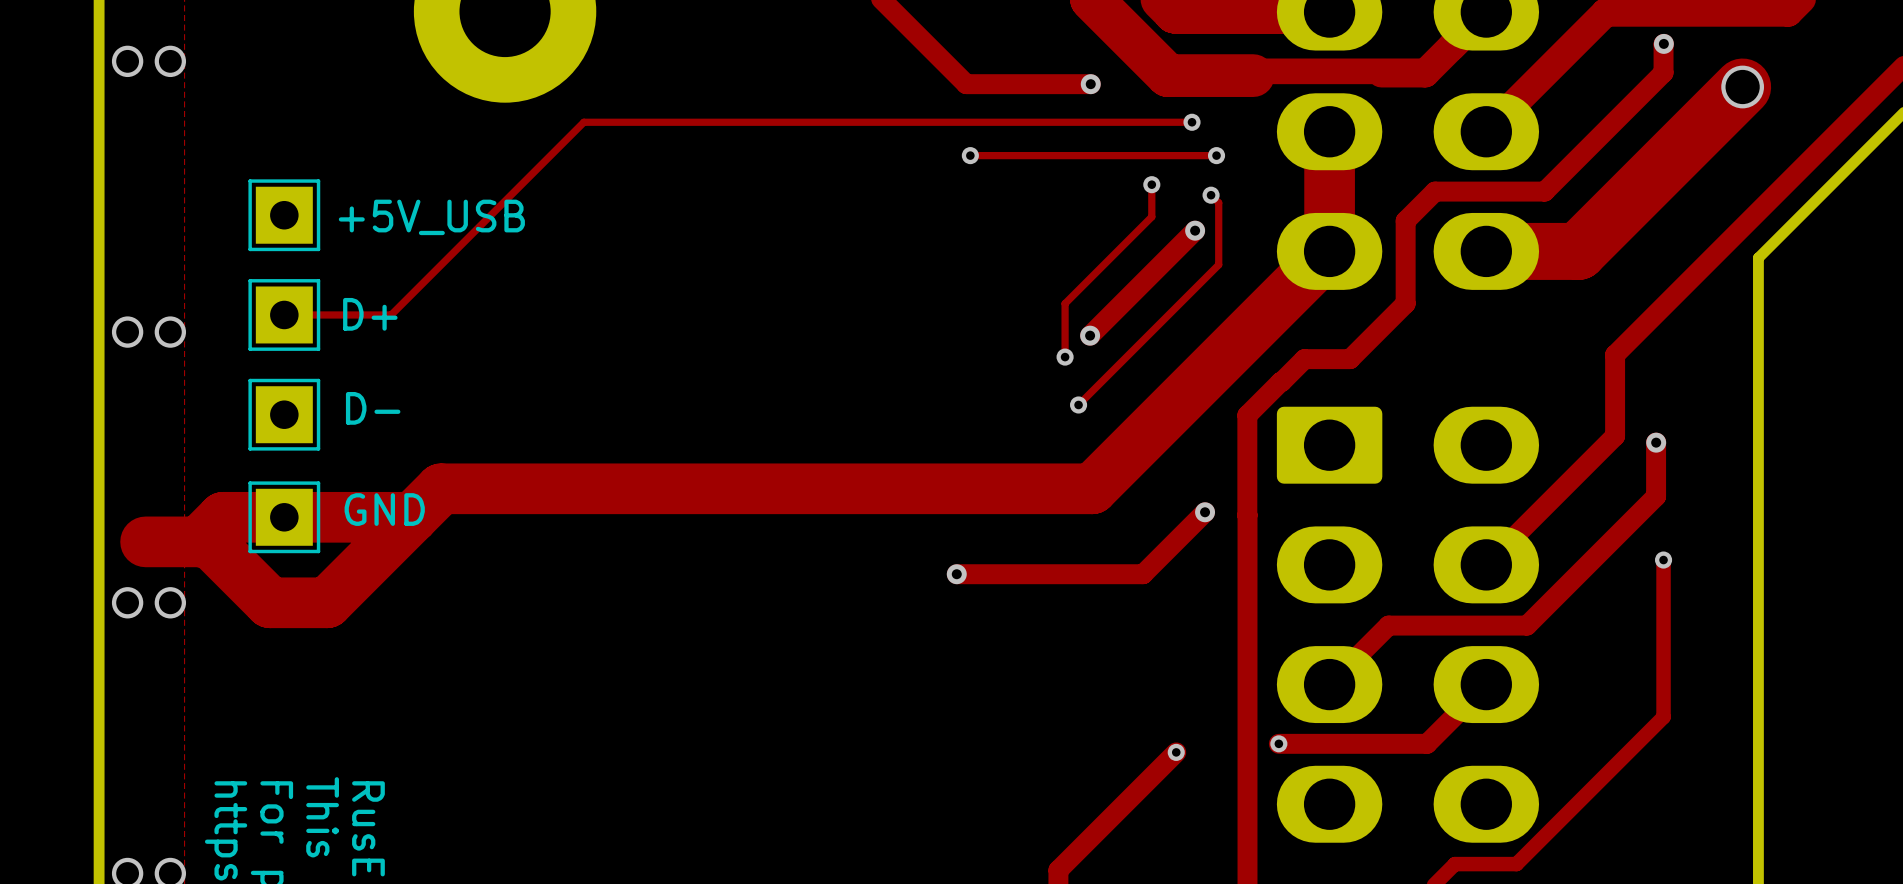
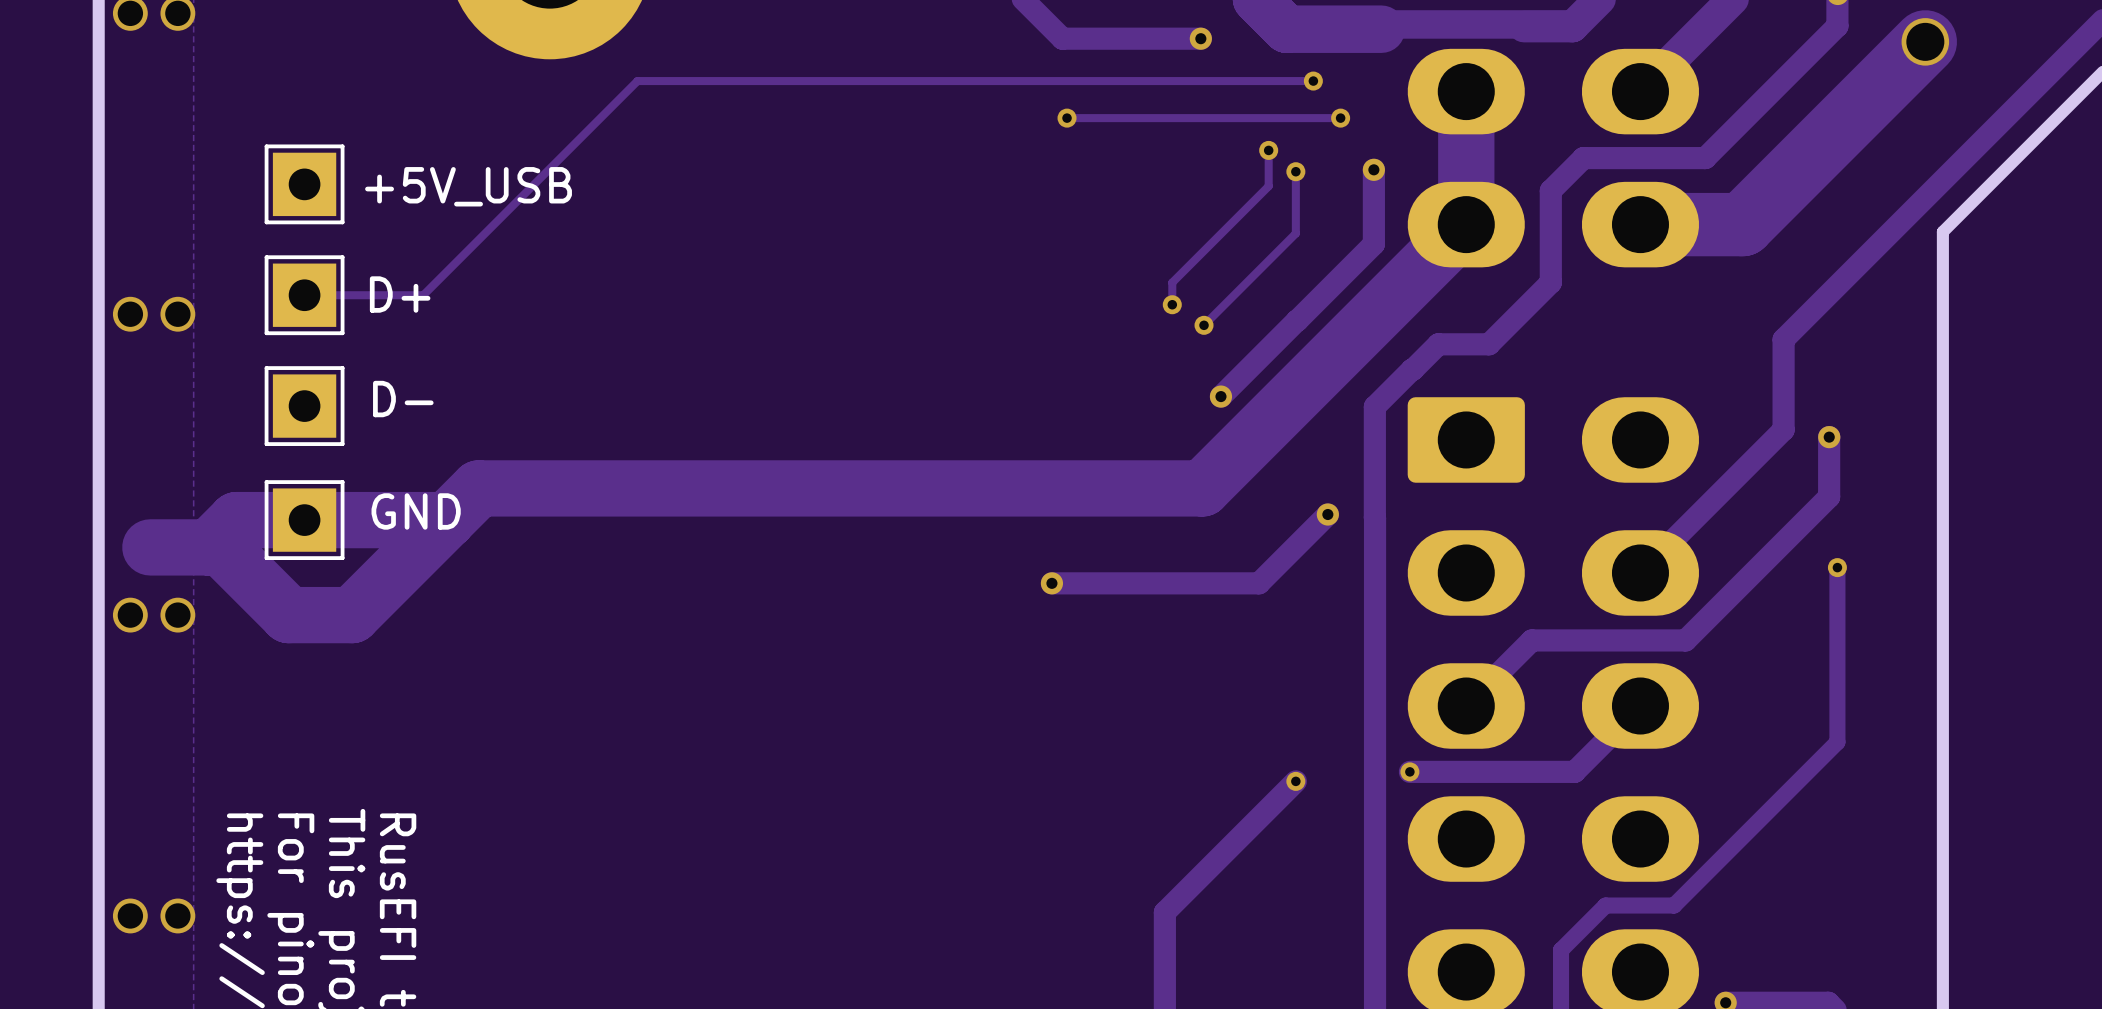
track: (1211, 195) (1218, 202) (1218, 264) (1078, 404) -> none
via position: (1211, 195) -> (1295, 171)
track: none -> (1373, 169) (1373, 244) (1297, 320)
track: none -> (1295, 171) (1295, 233) (1204, 325)
track: (1195, 230) (1090, 335) -> none
via position: (1195, 230) -> (1373, 169)
track: (1065, 323) (1065, 357) -> none
via: none -> (1172, 304)
via position: (1090, 335) -> (1220, 396)
track: none -> (1296, 320) (1220, 396)
via: none -> (1204, 325)
via: (1065, 357) -> none
via: (1078, 404) -> none

